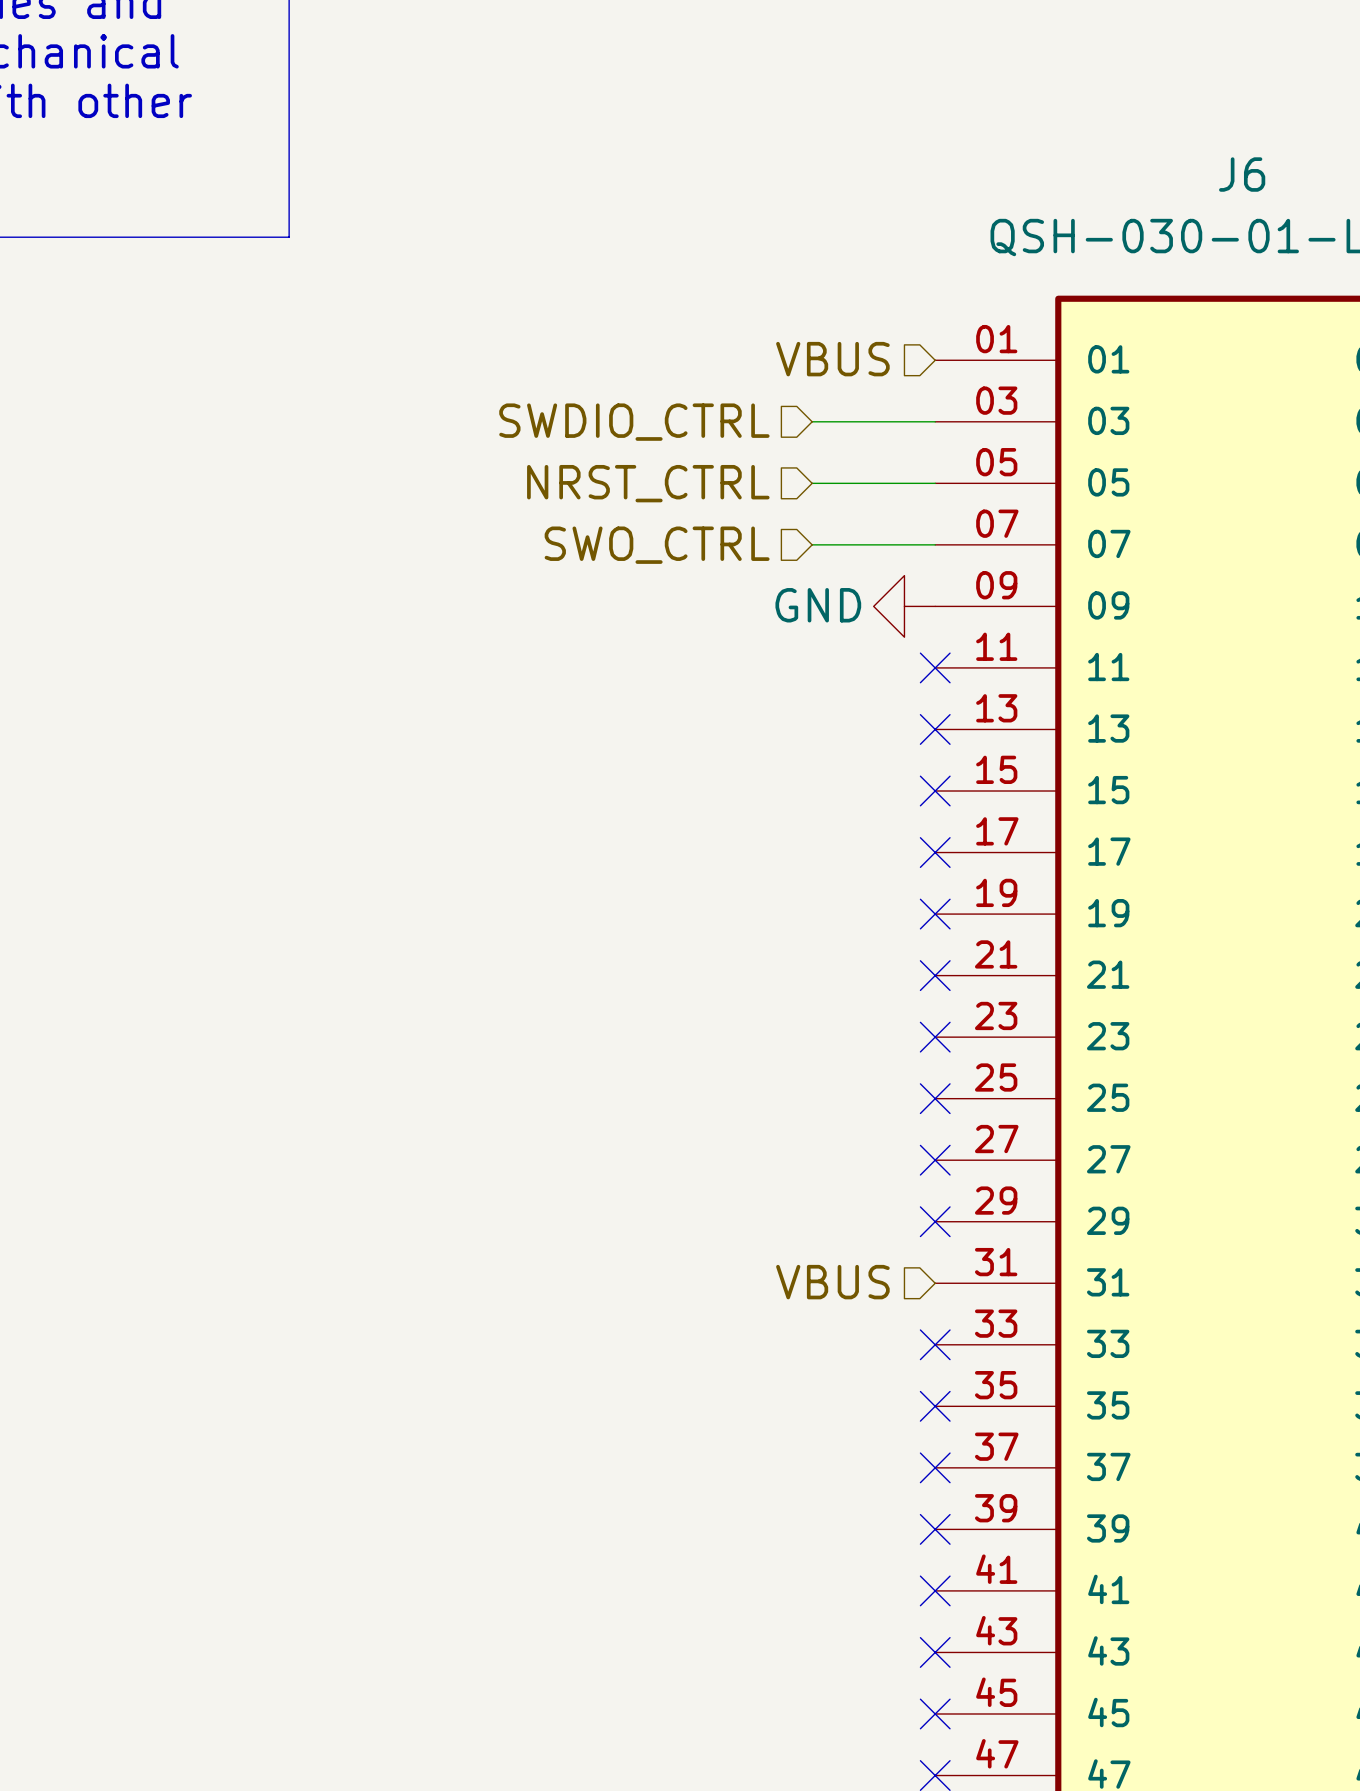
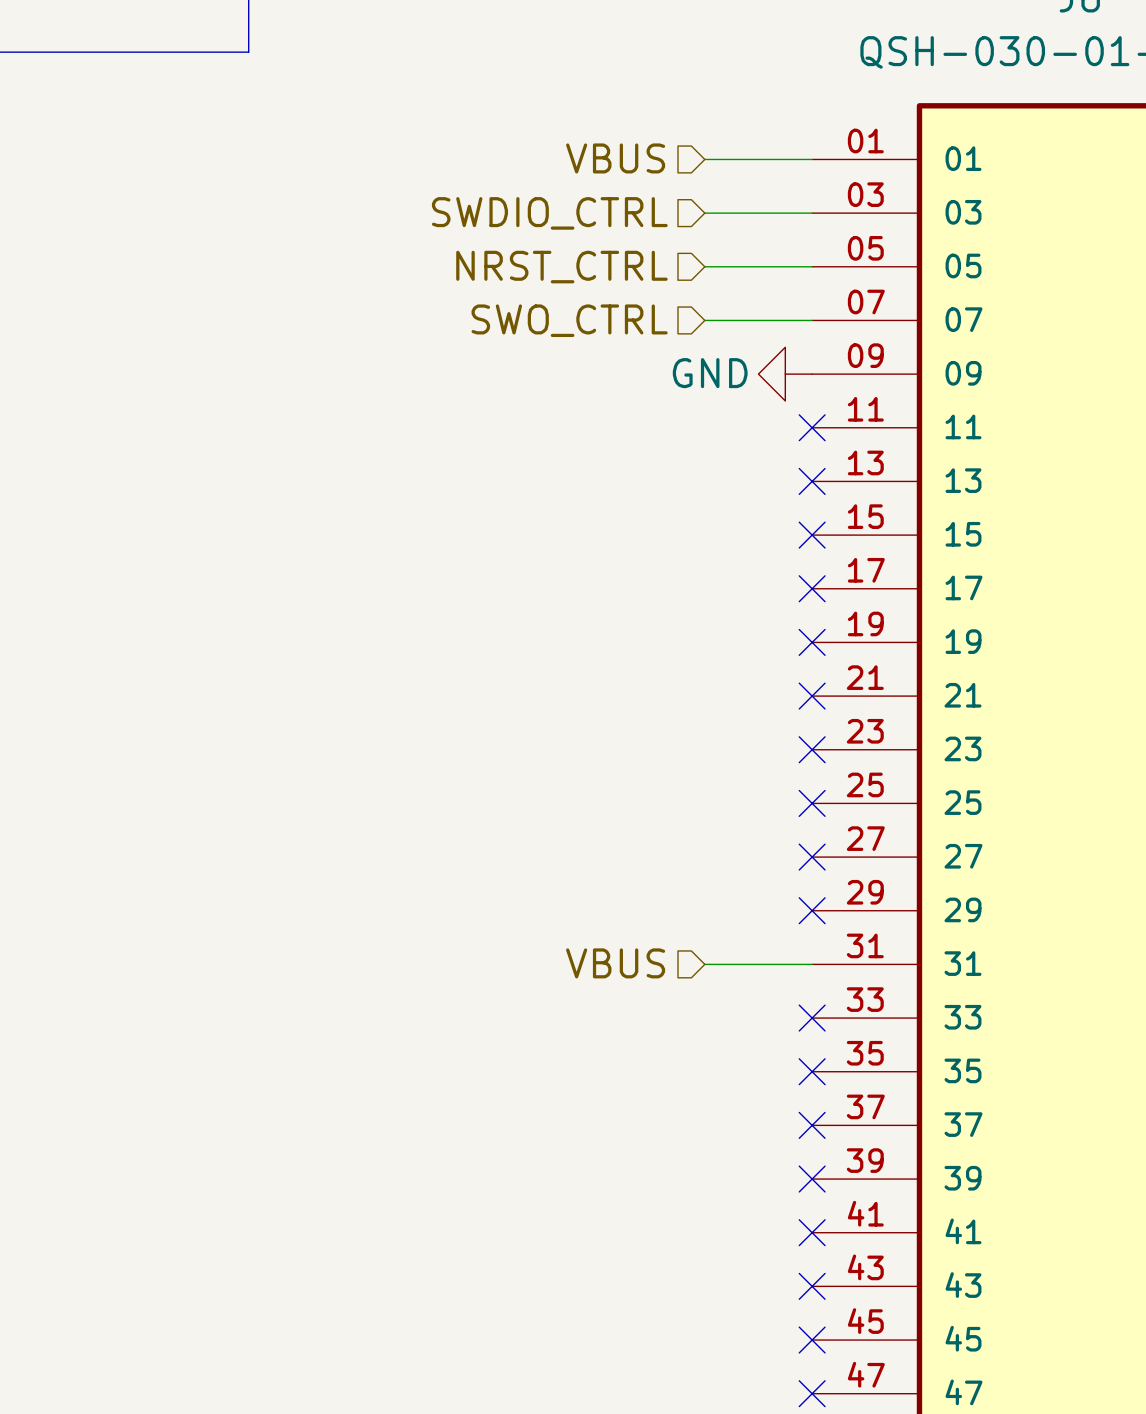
hierarchical label position: VBUS (832, 359) -> VBUS (615, 158)
wire: none -> (704, 159) (812, 159)
hierarchical label position: VBUS (832, 1282) -> VBUS (615, 963)
wire: none -> (704, 964) (812, 964)

